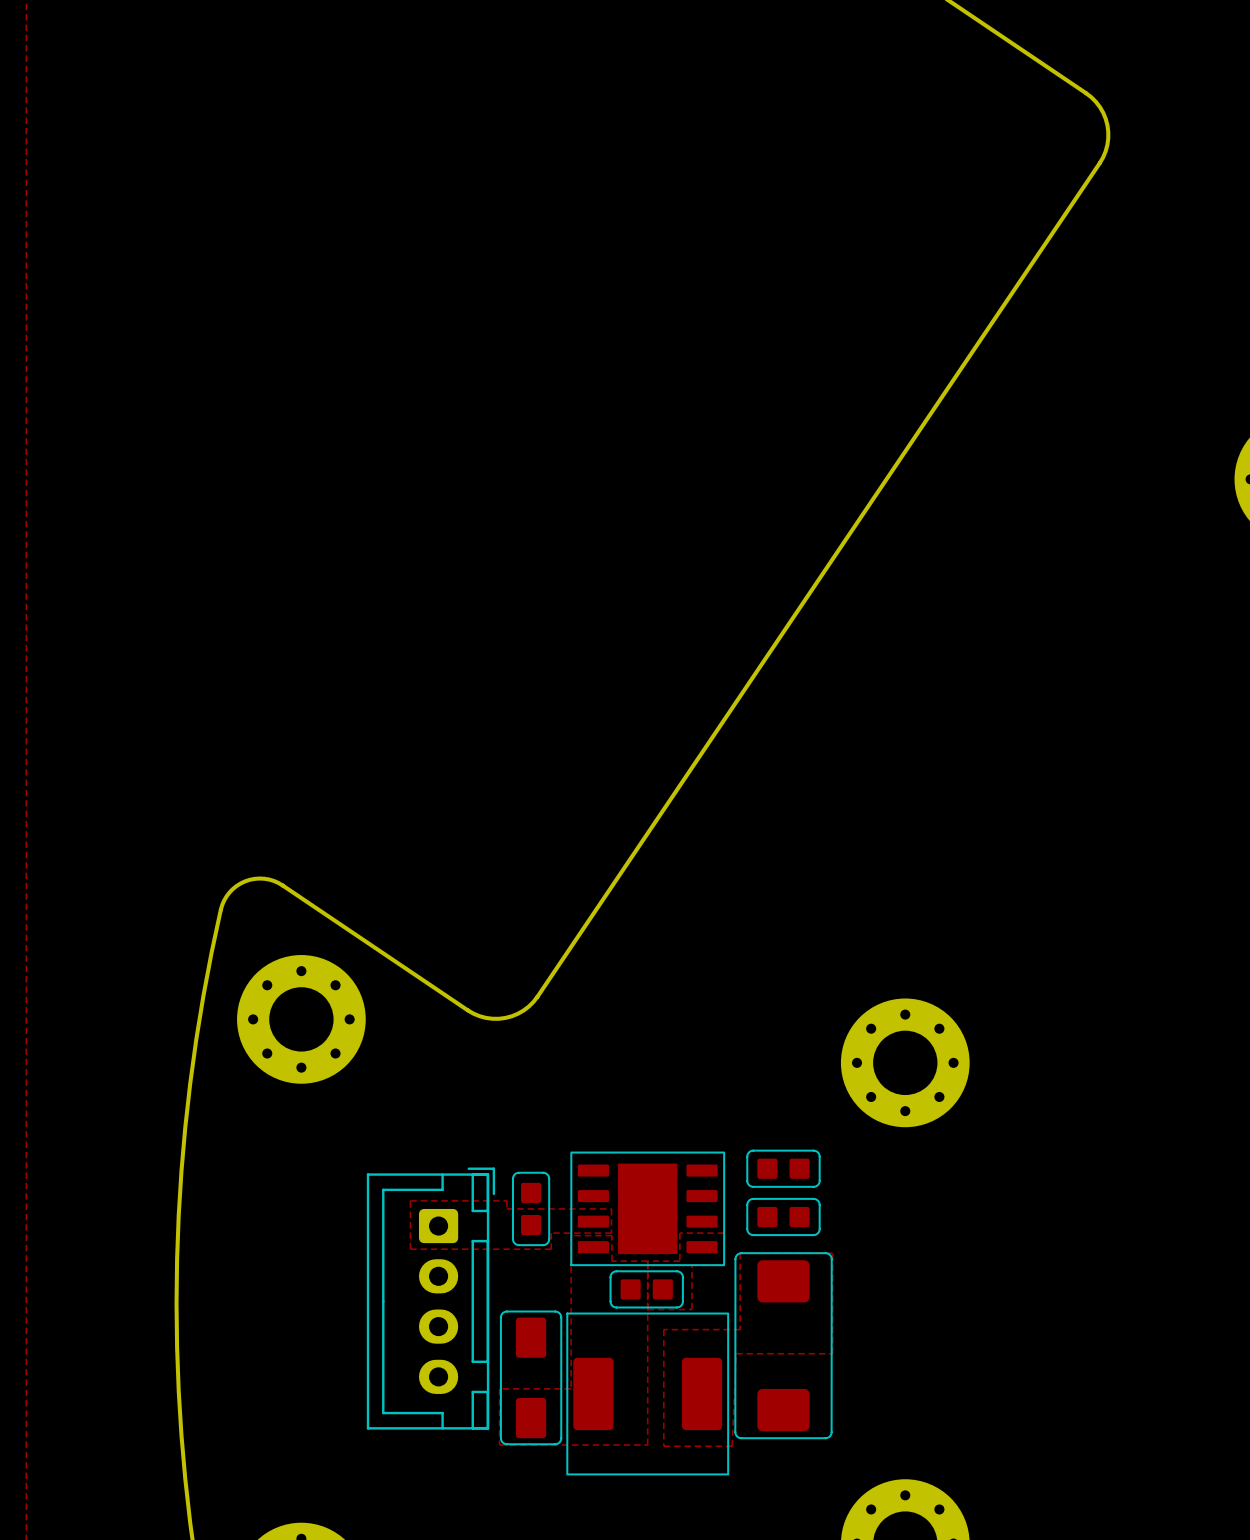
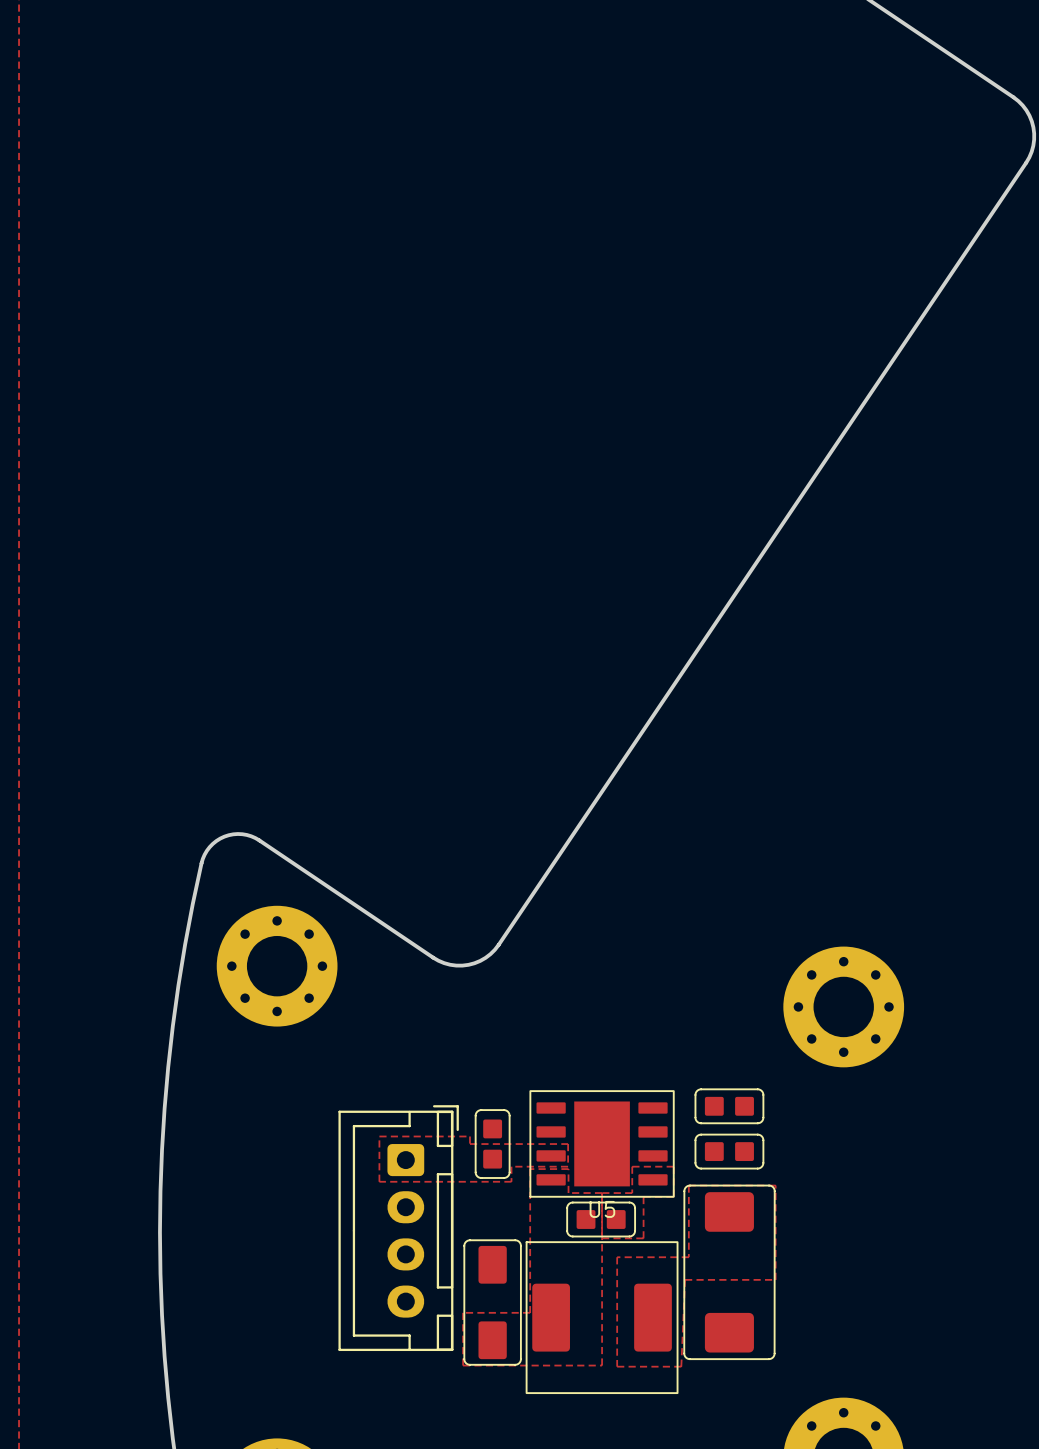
U5 name: none -> U5 (602, 1209)

